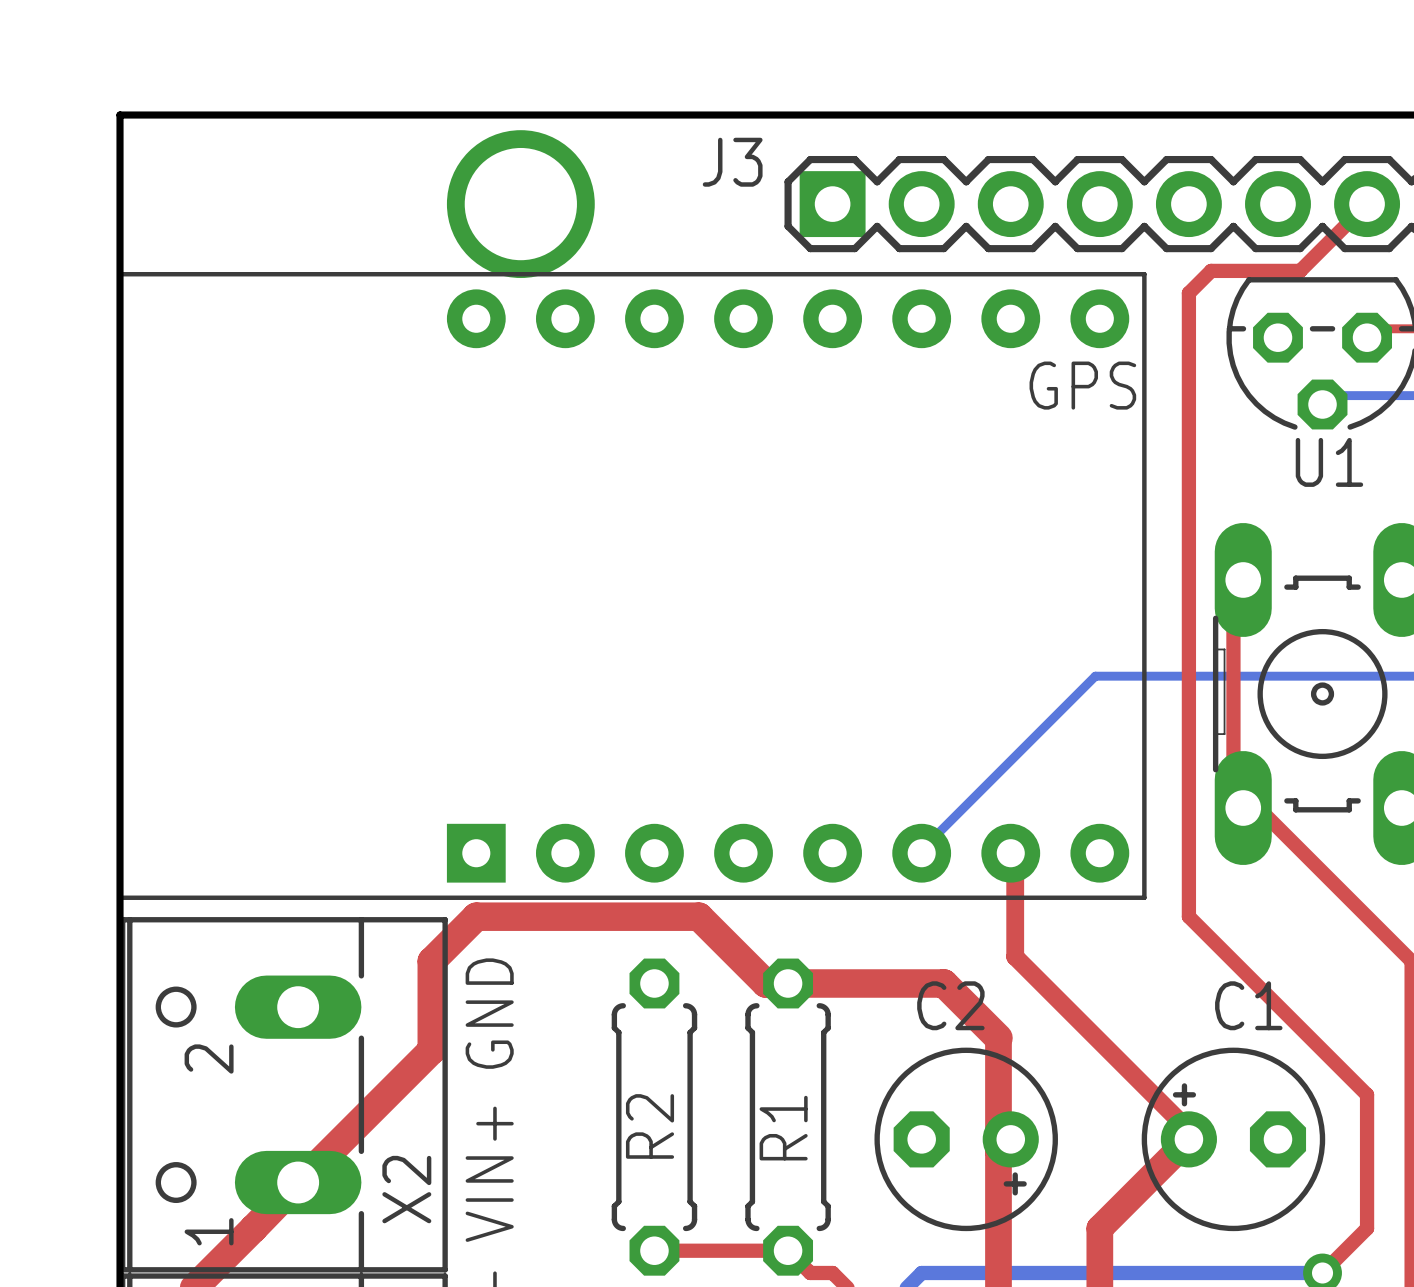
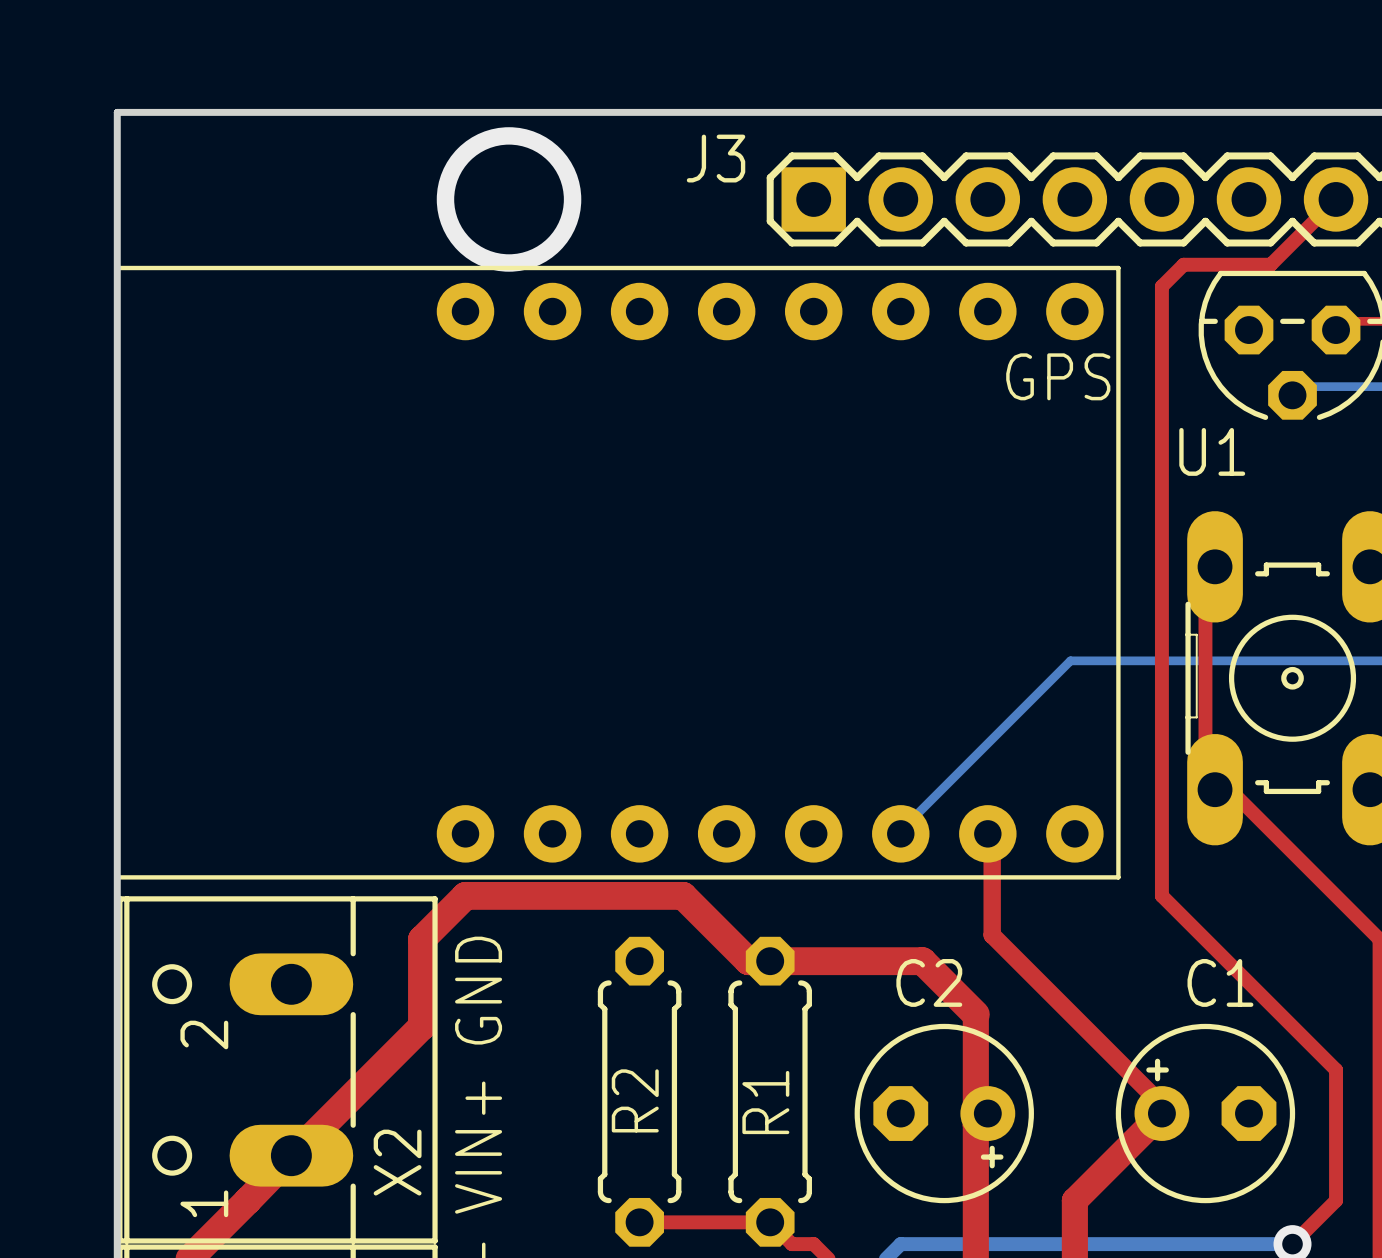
GPS footprint: [117, 272, 1147, 900] -> [115, 265, 1121, 880]
U1 name position: U1 (1329, 462) -> U1 (1212, 451)

